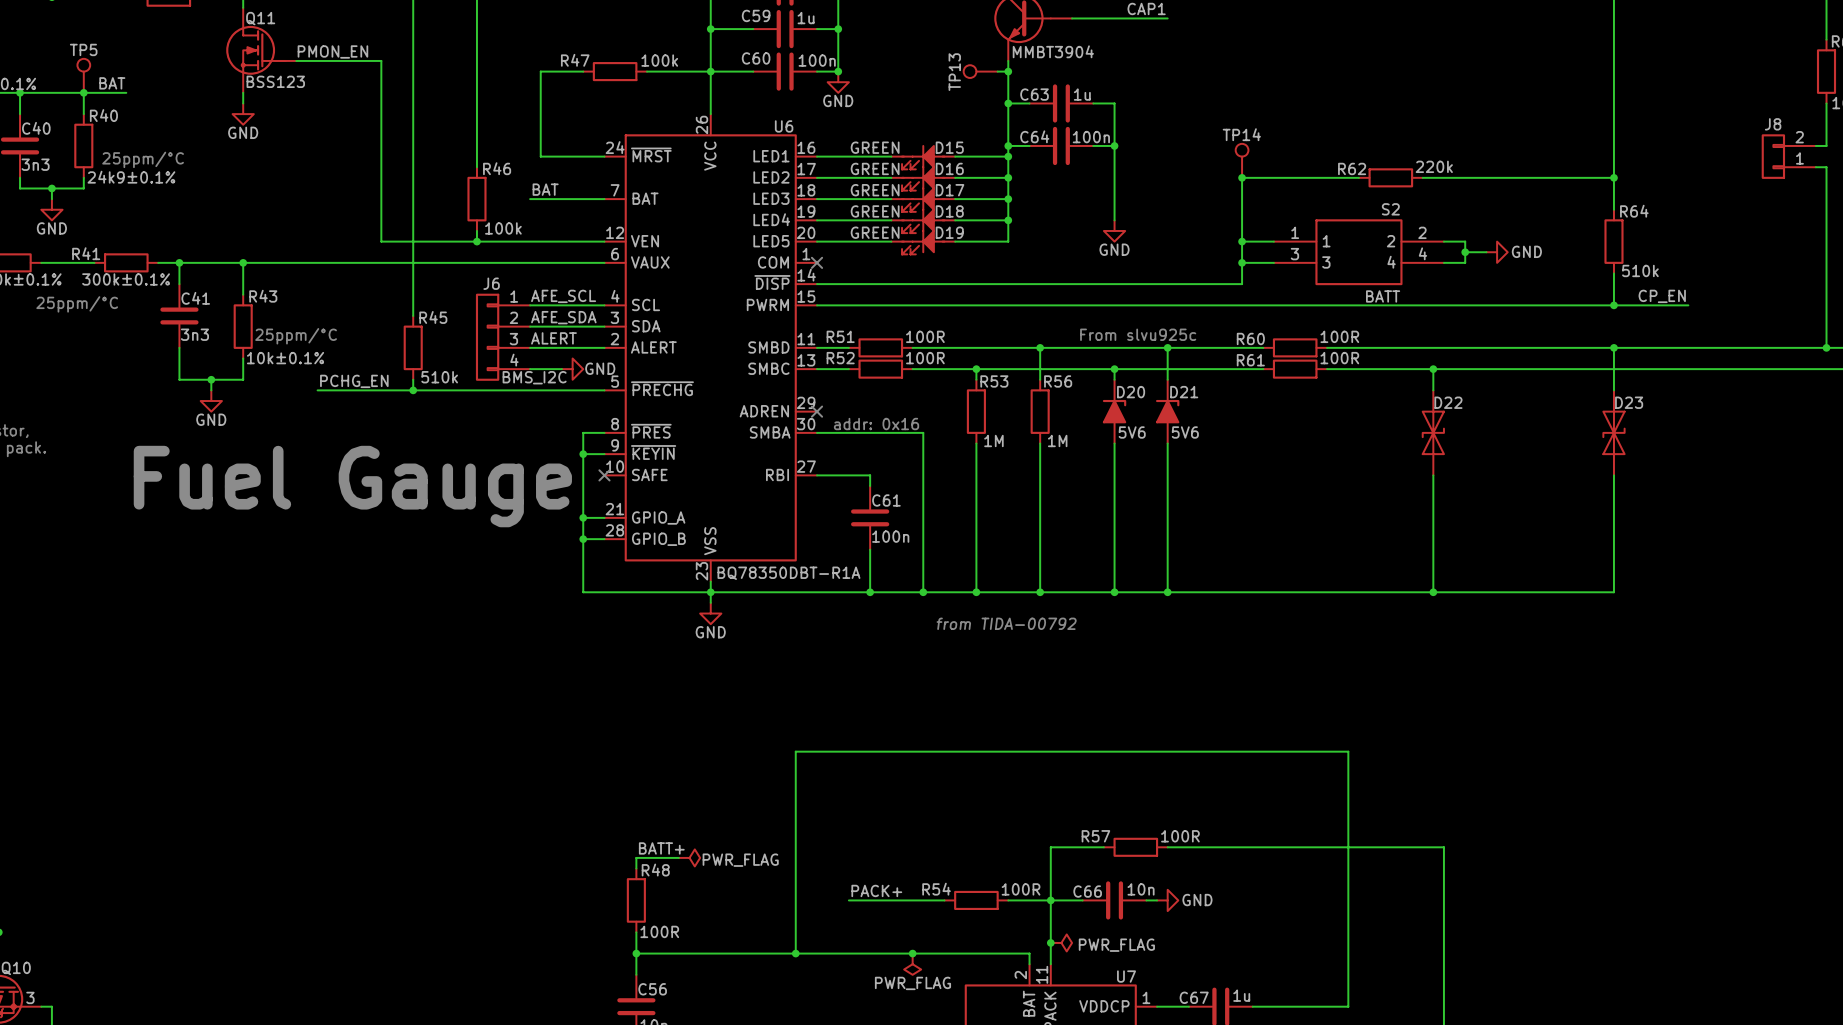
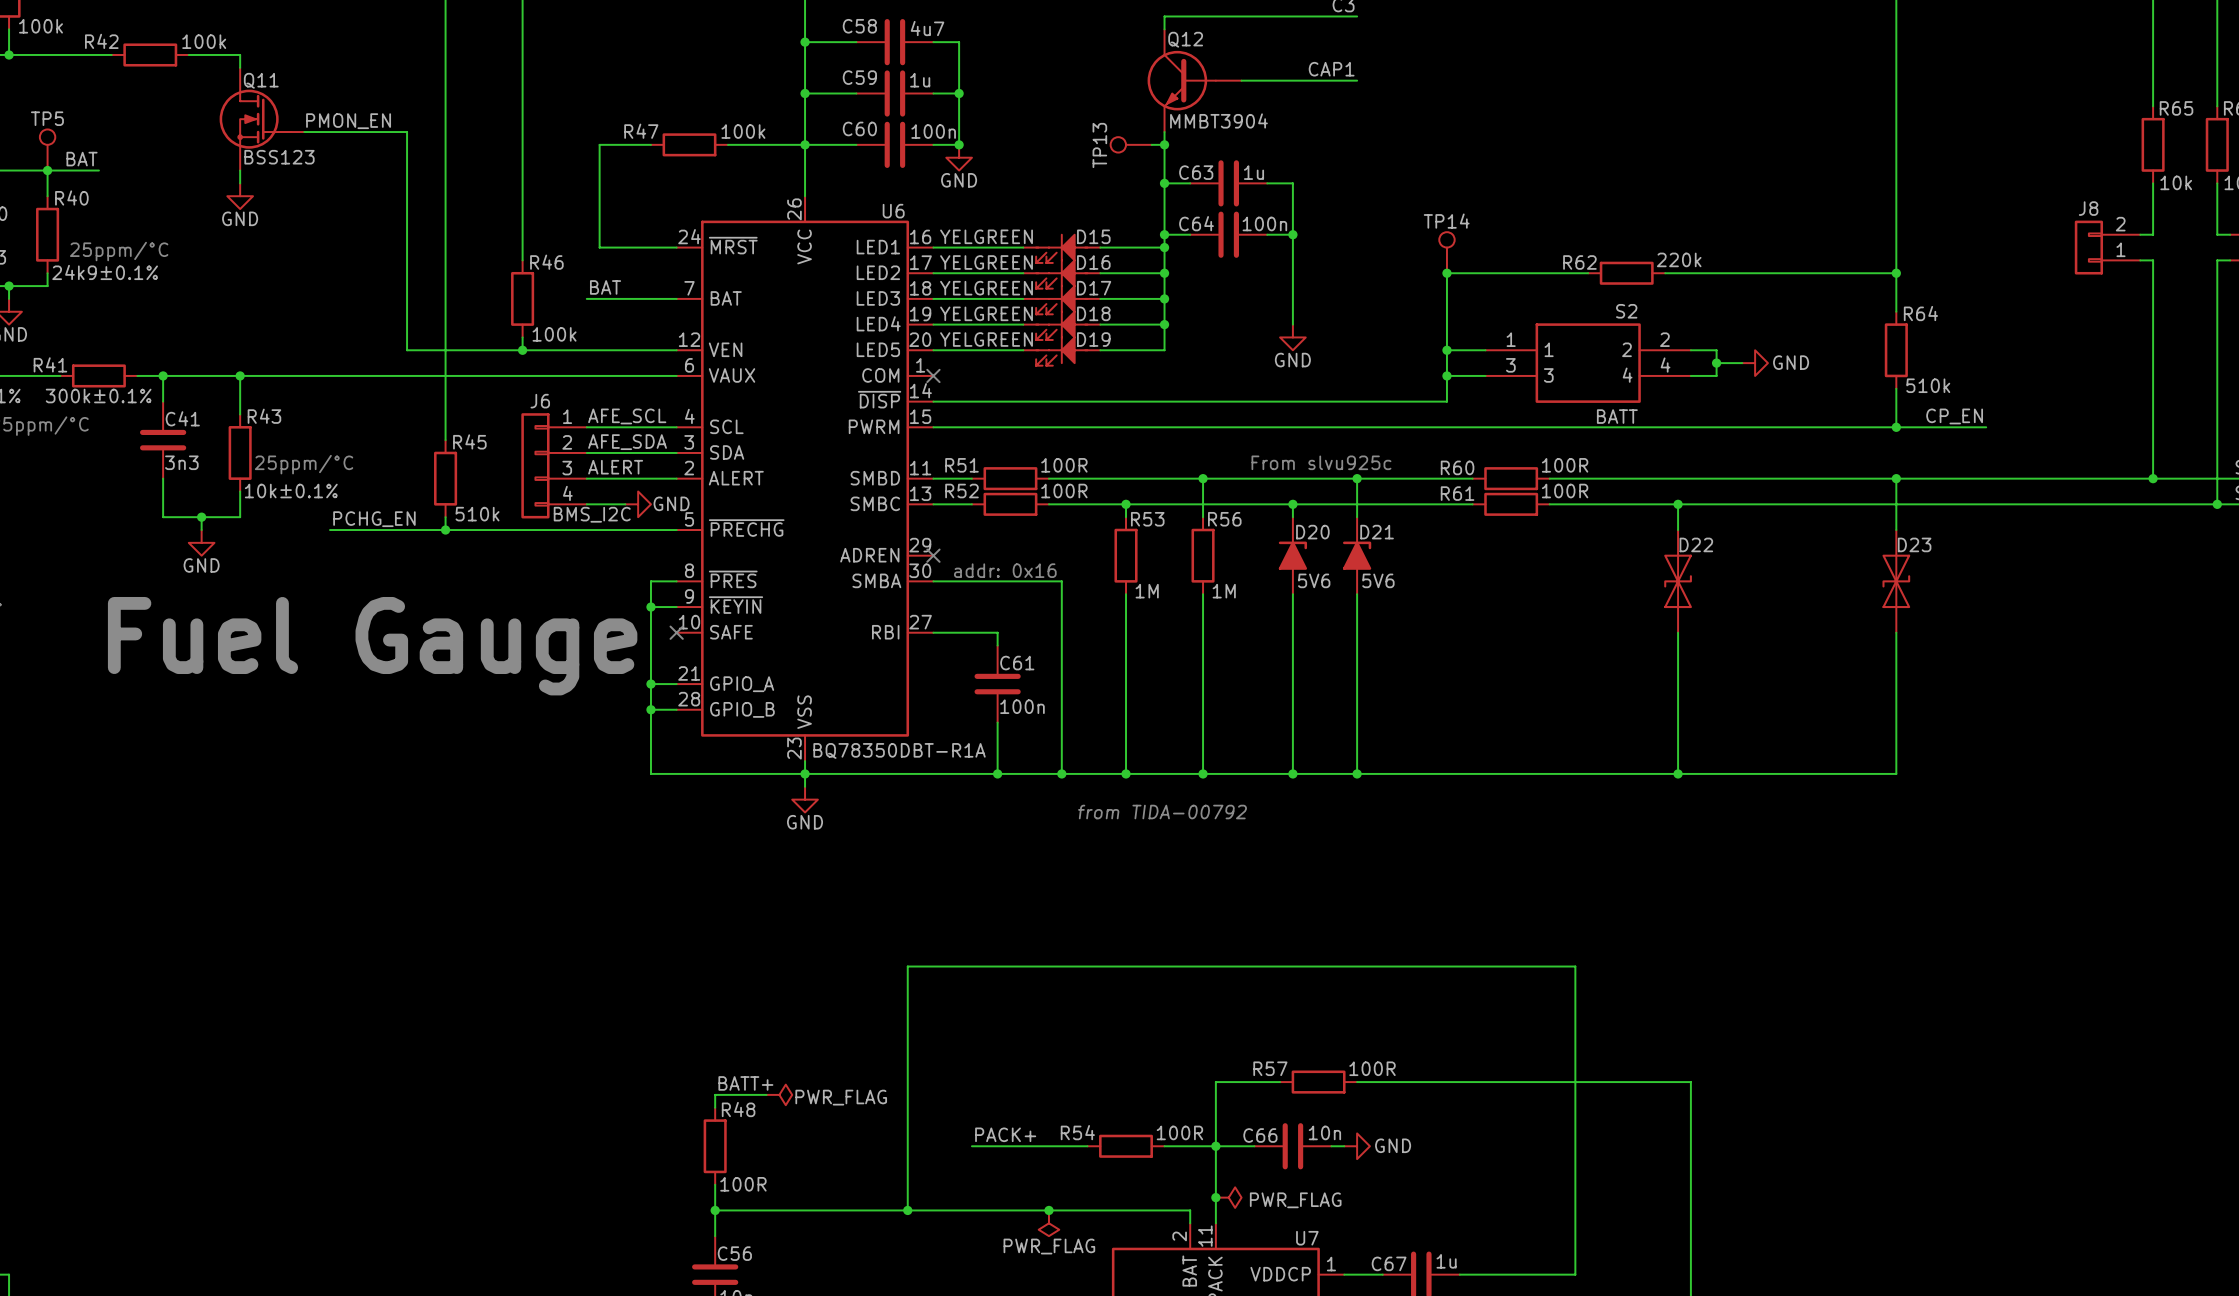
D15 value: GREEN (875, 147) -> YELGREEN (986, 236)
D16 value: GREEN (875, 168) -> YELGREEN (986, 262)
D17 value: GREEN (875, 190) -> YELGREEN (986, 288)
D18 value: GREEN (875, 211) -> YELGREEN (986, 313)
D19 value: GREEN (875, 232) -> YELGREEN (986, 339)

